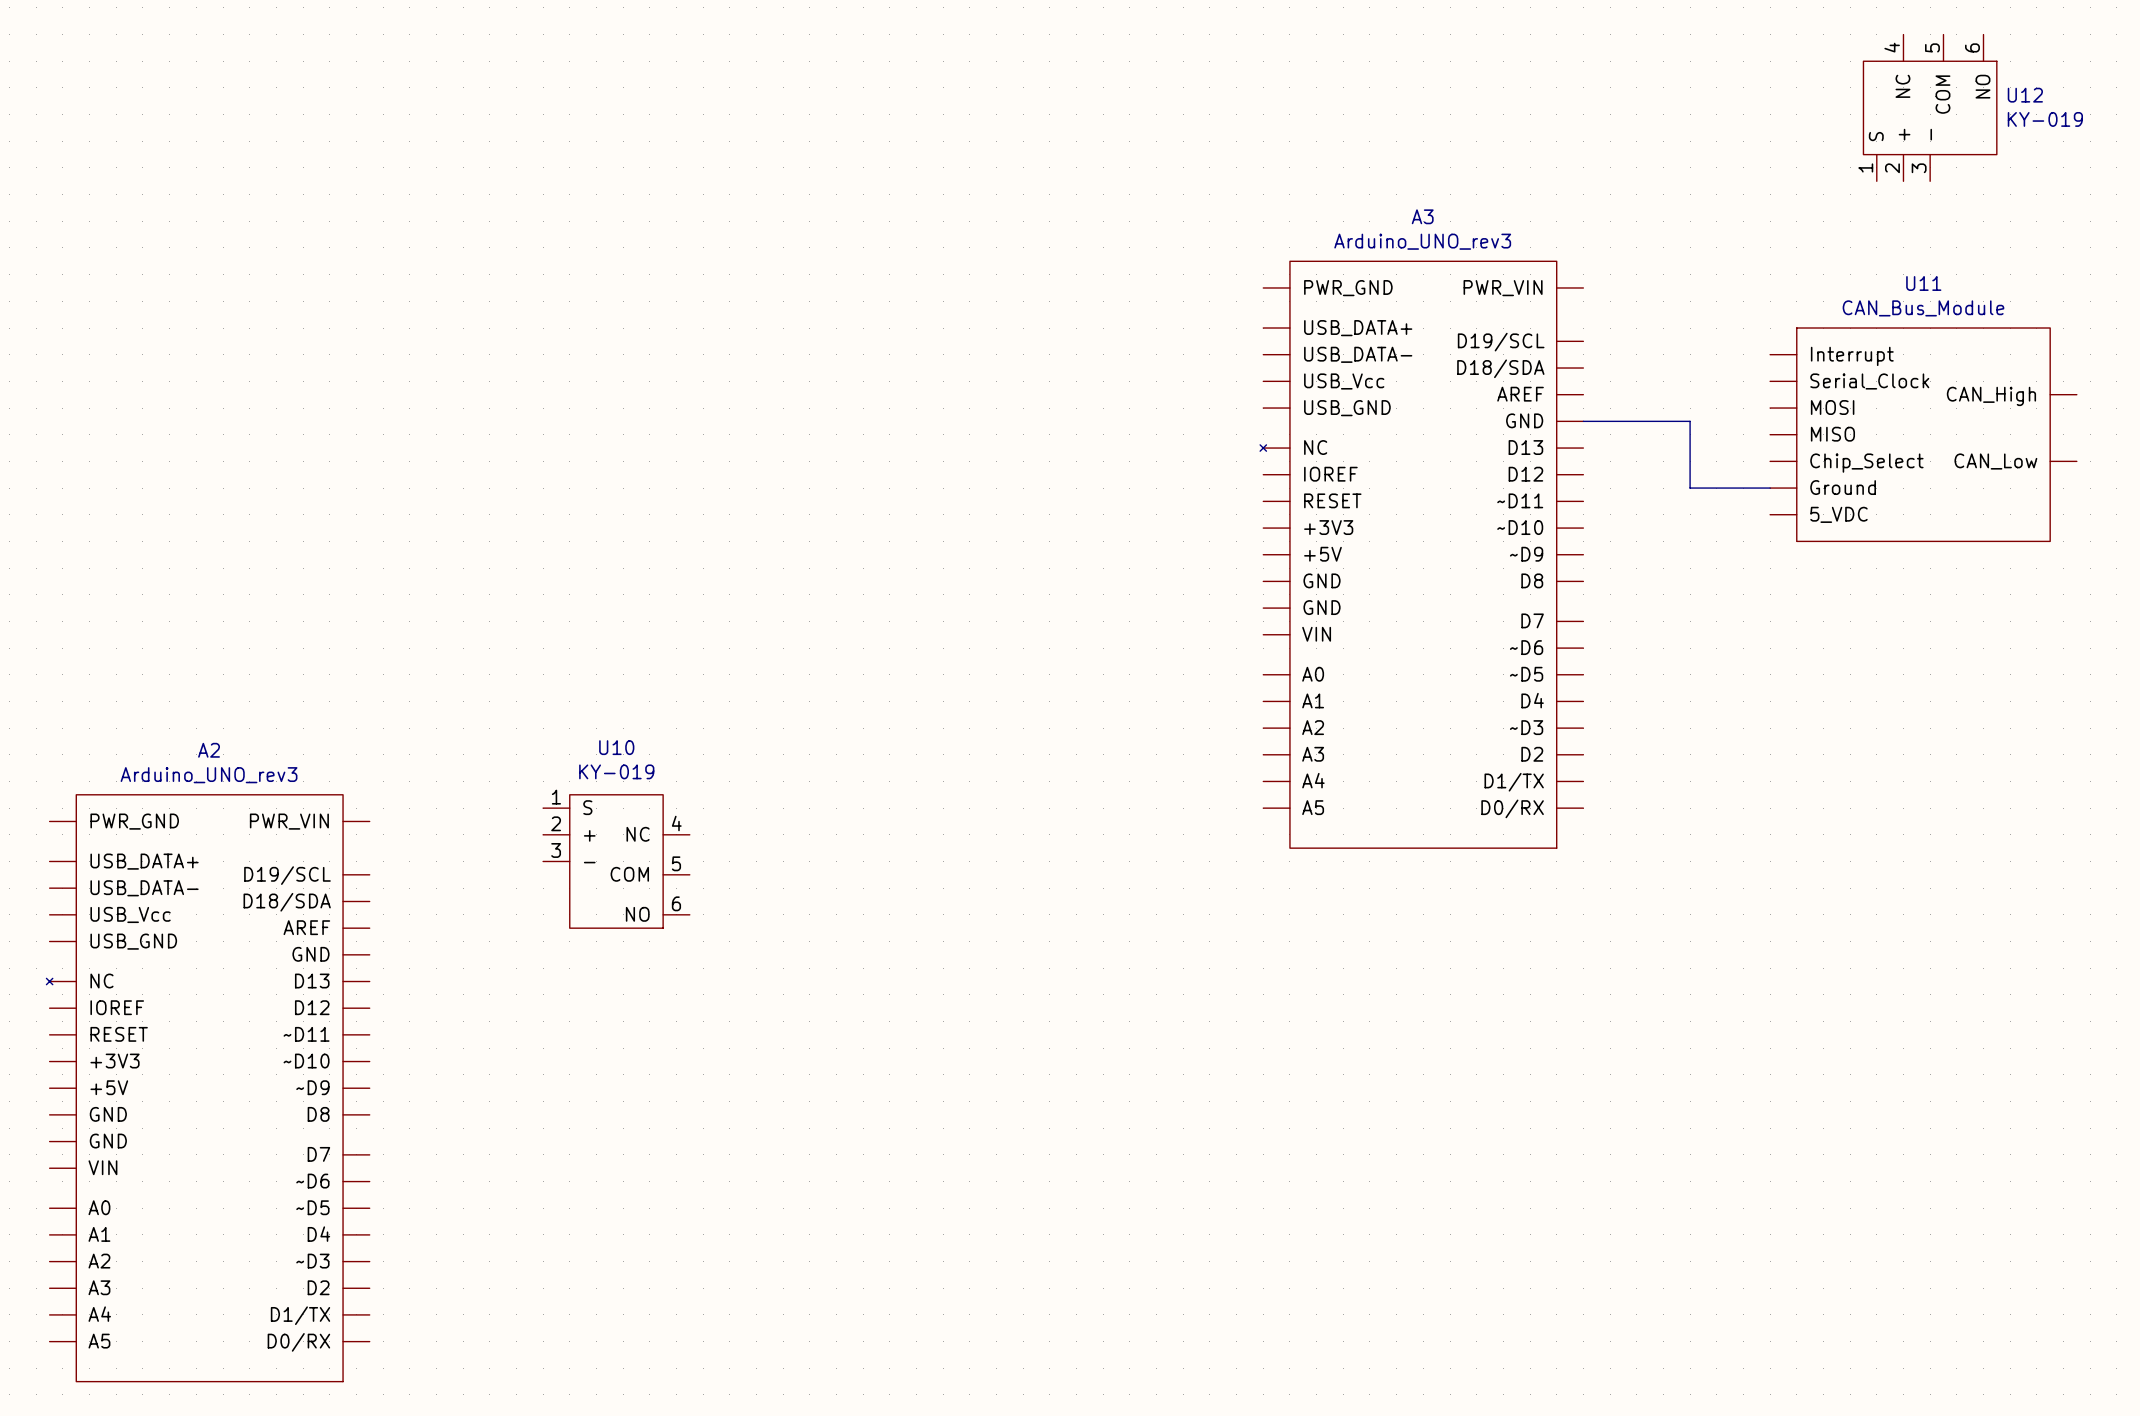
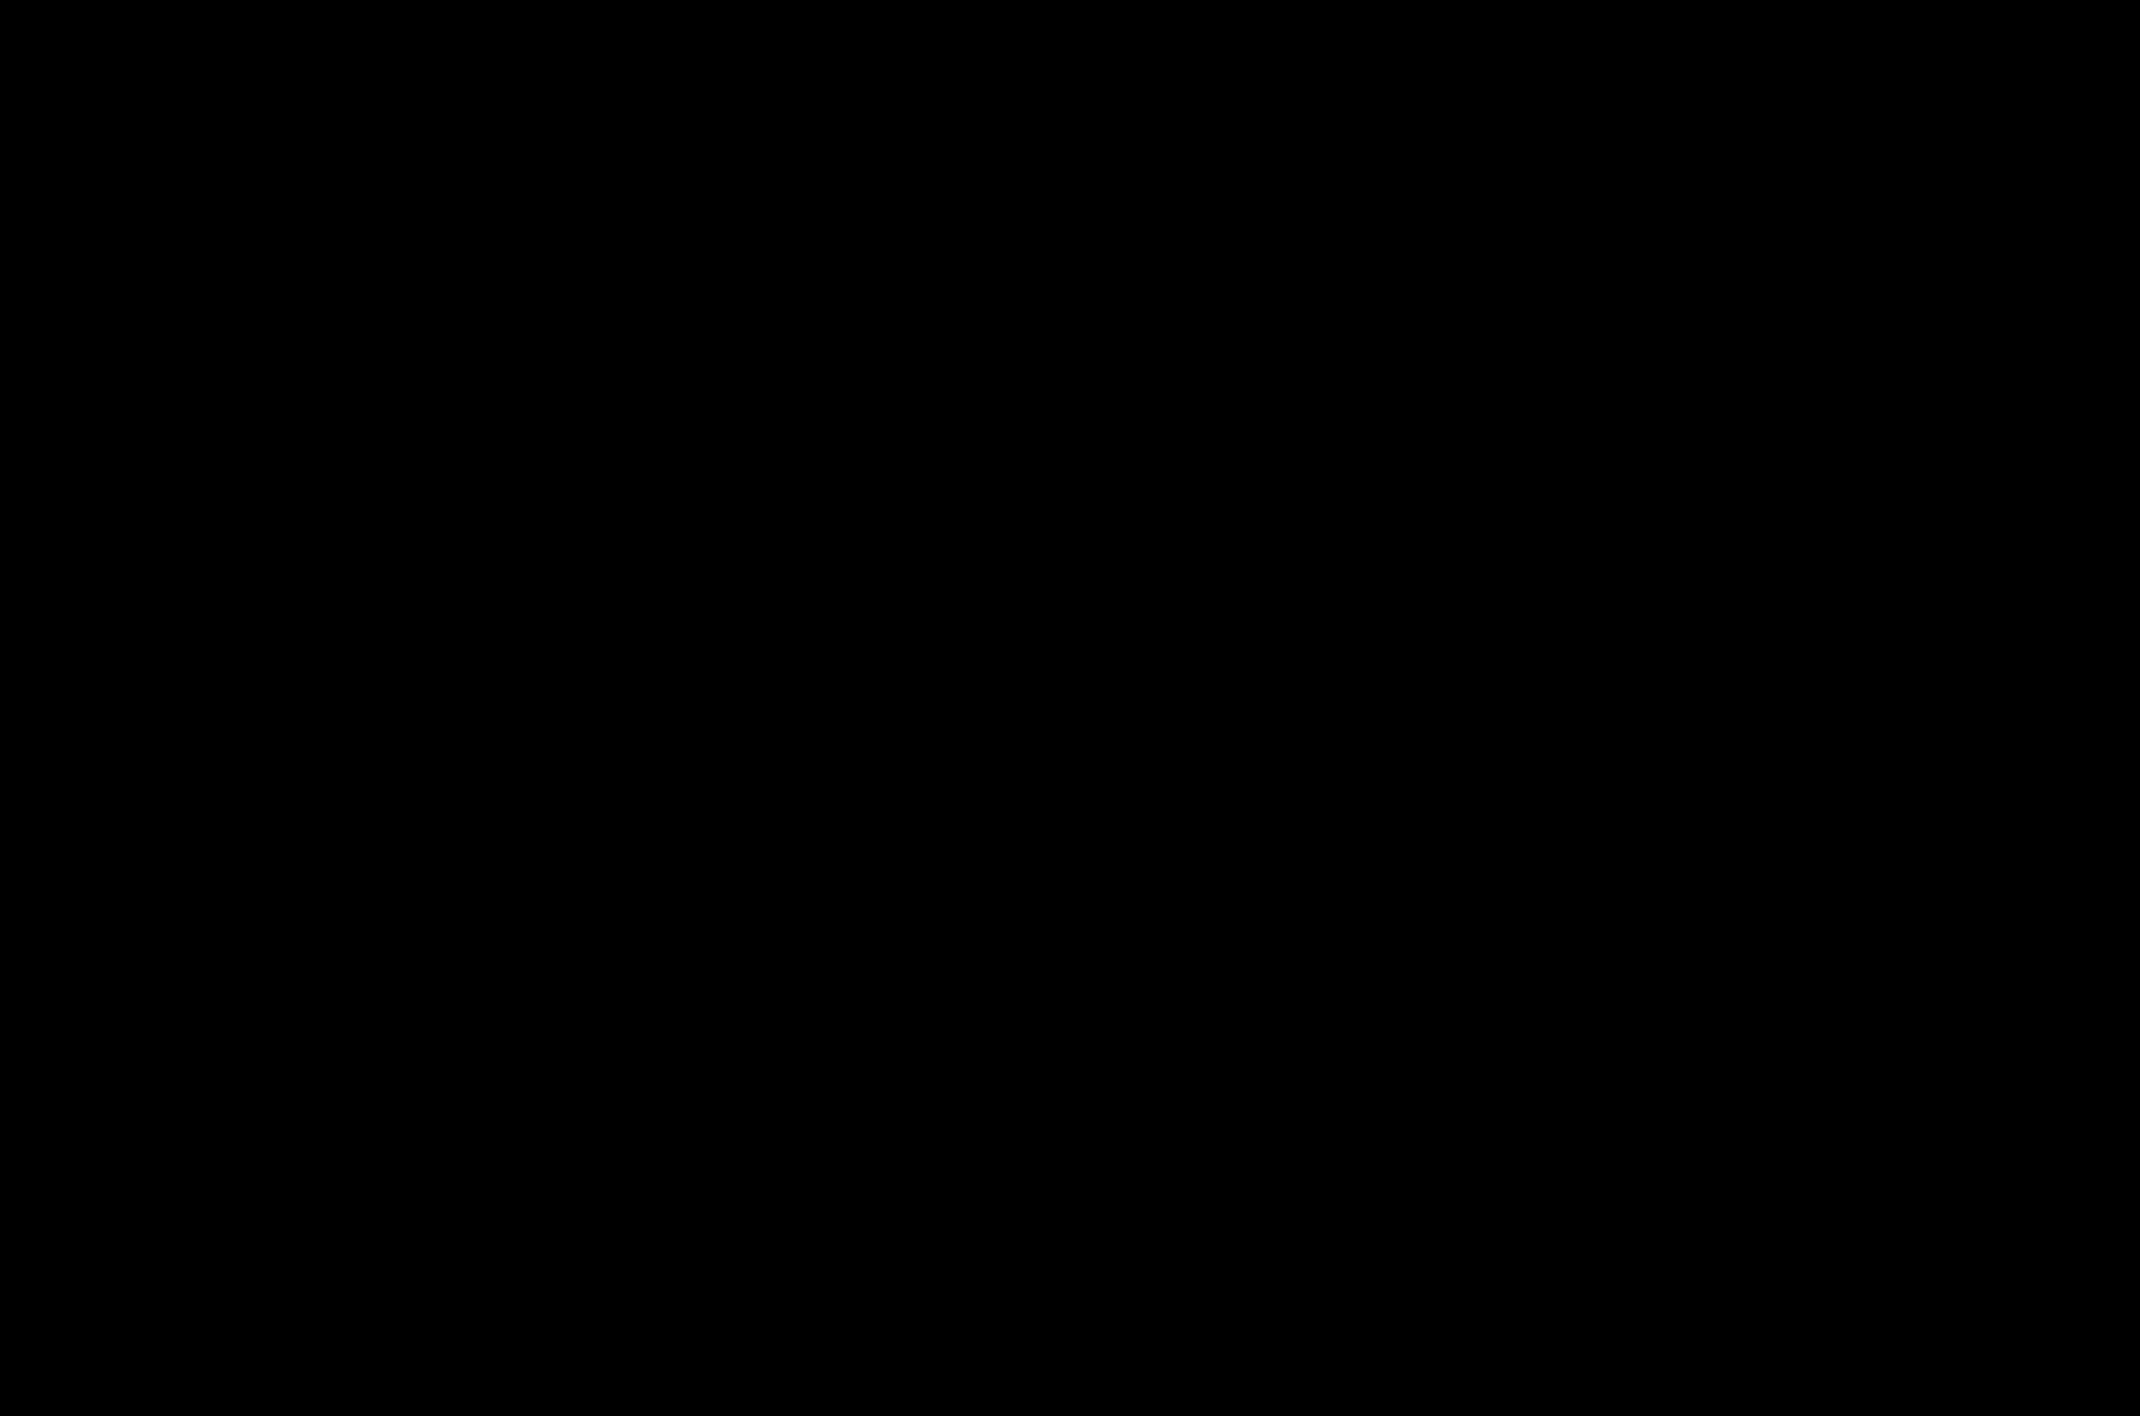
U12: KY-019 (1930, 107) -> none
wire: (1583, 421) (1690, 421) (1690, 488) (1770, 488) -> none
U11: CAN_Bus_Module (1923, 434) -> none
A3: Arduino_UNO_rev3 (1421, 554) -> none
U10: KY-019 (616, 861) -> none
A2: Arduino_UNO_rev3 (208, 1088) -> none

